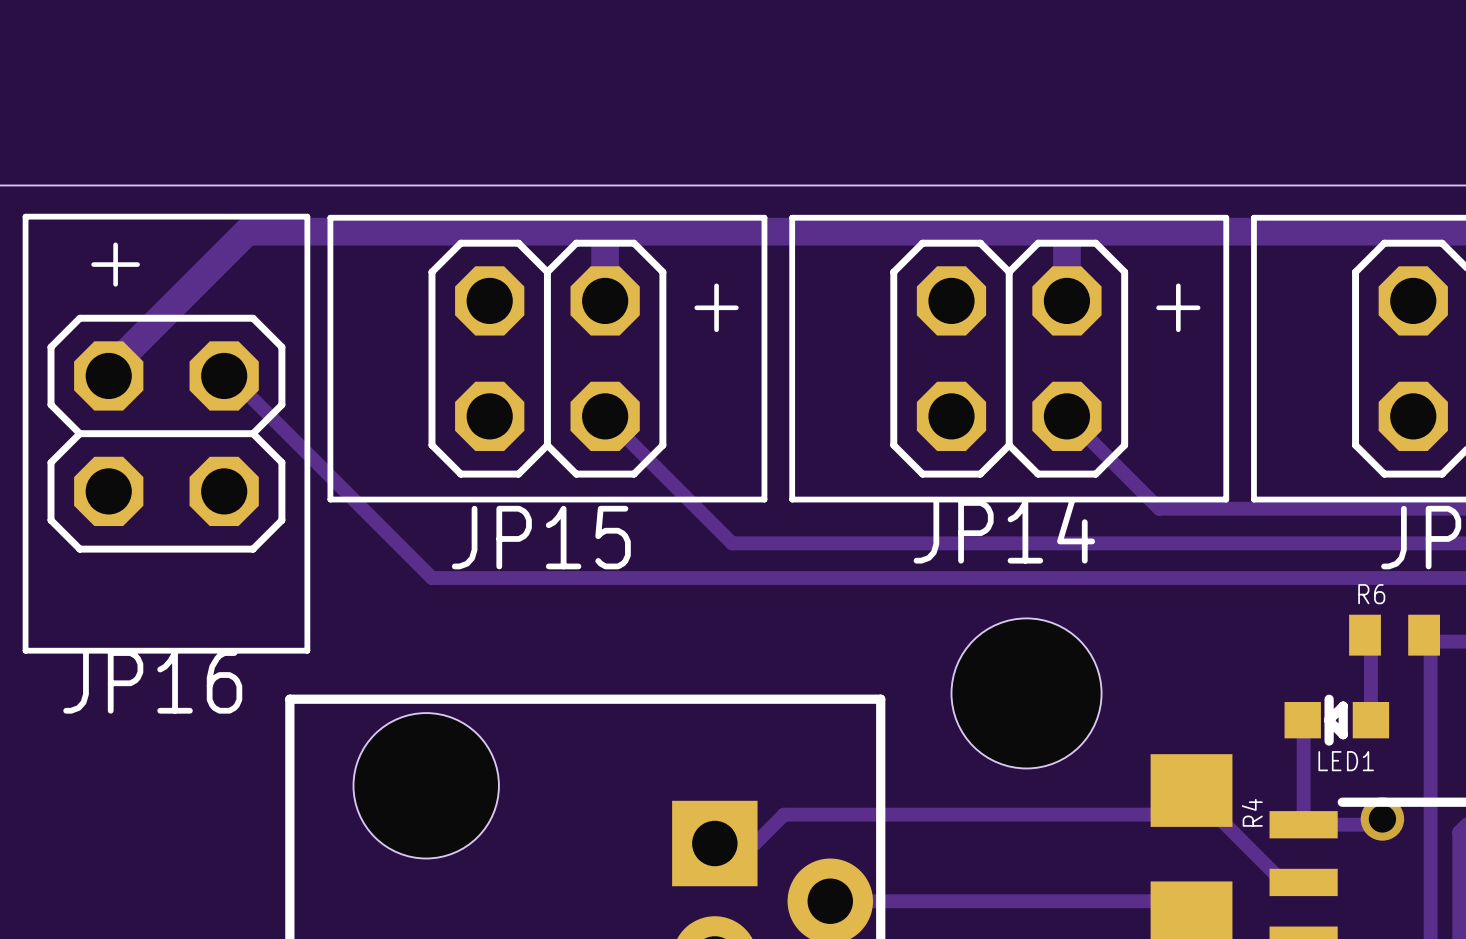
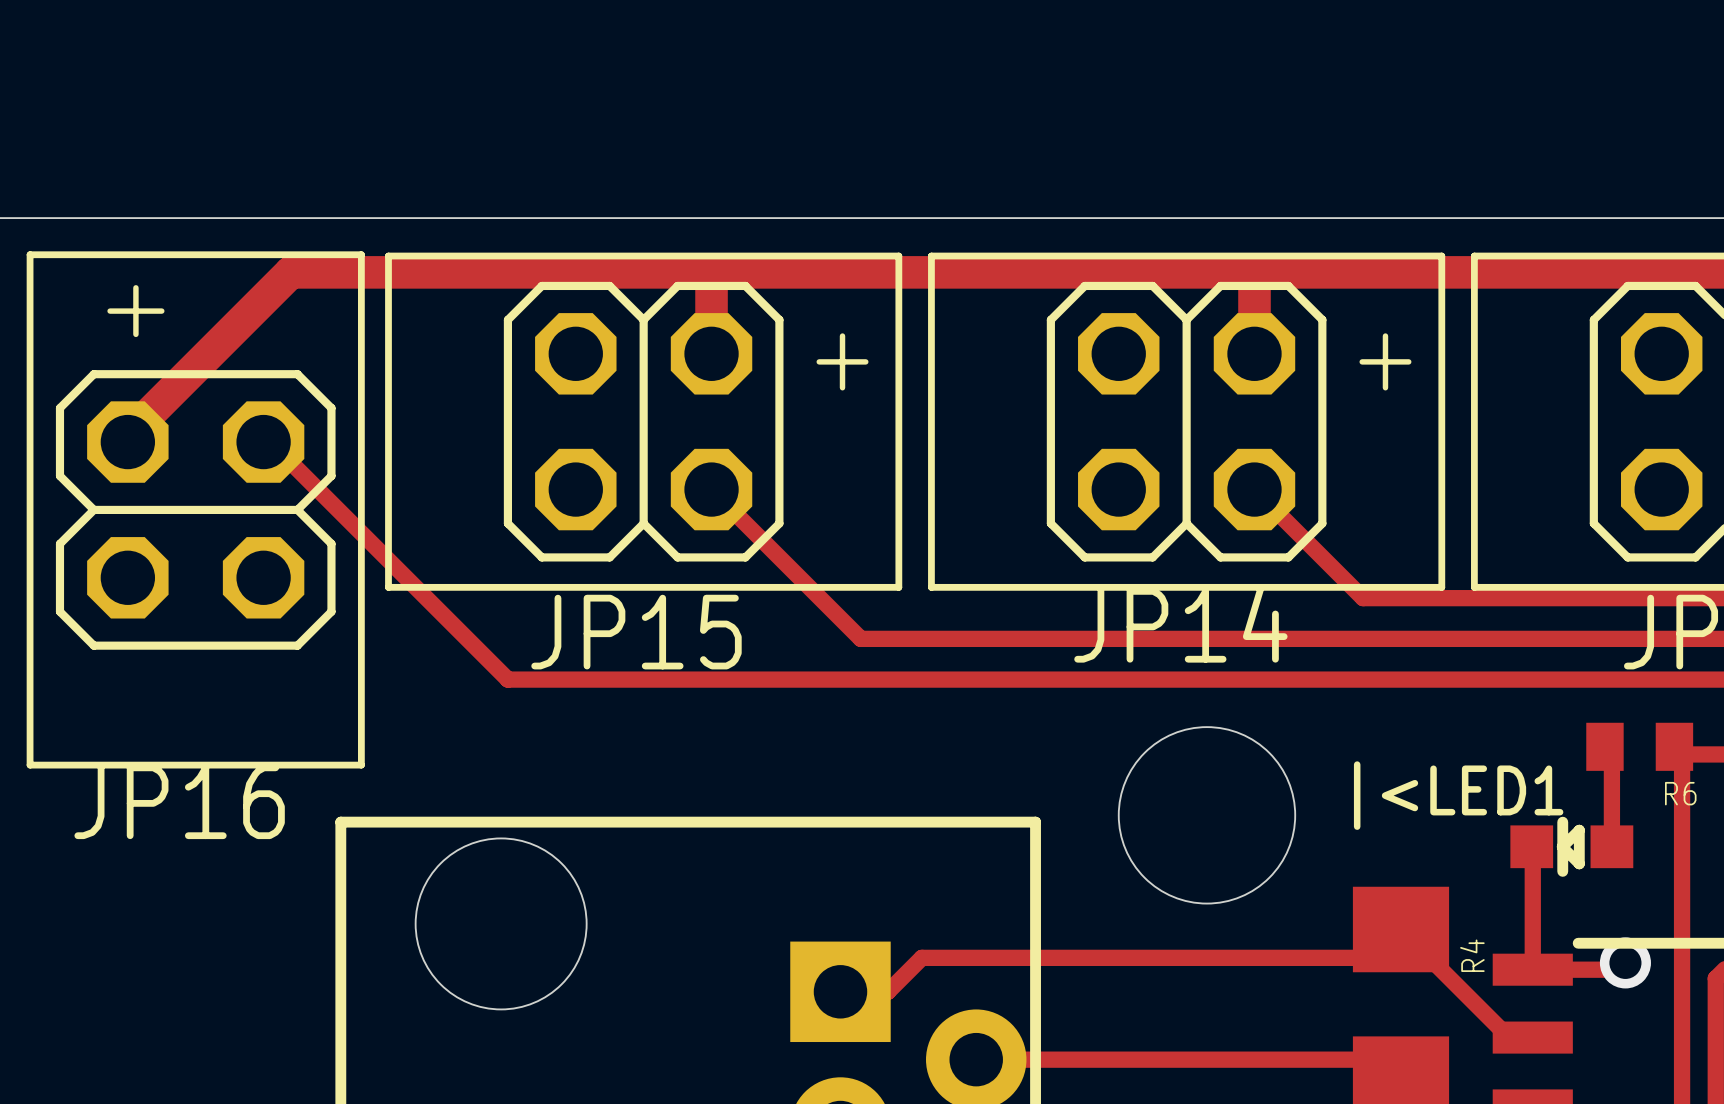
R6 name position: R6 (1371, 594) -> R6 (1680, 793)
LED1 name: LED1 (1346, 761) -> |<LED1 (1458, 795)

